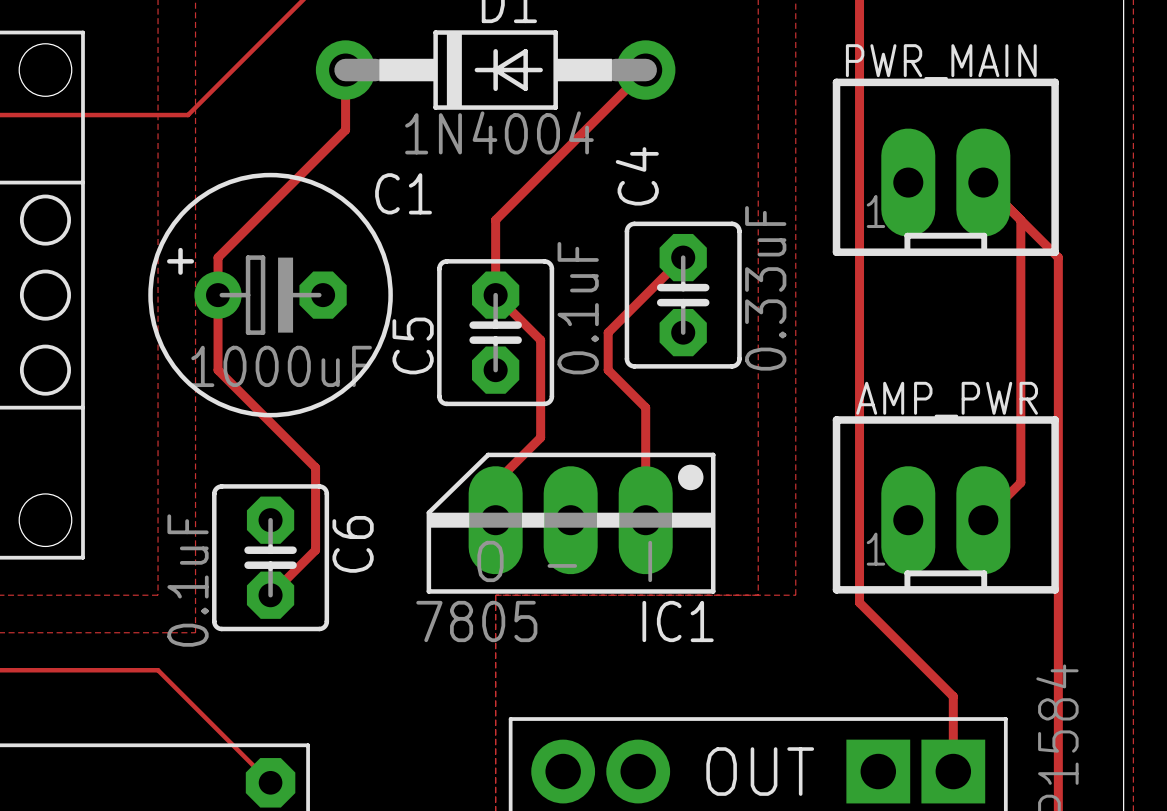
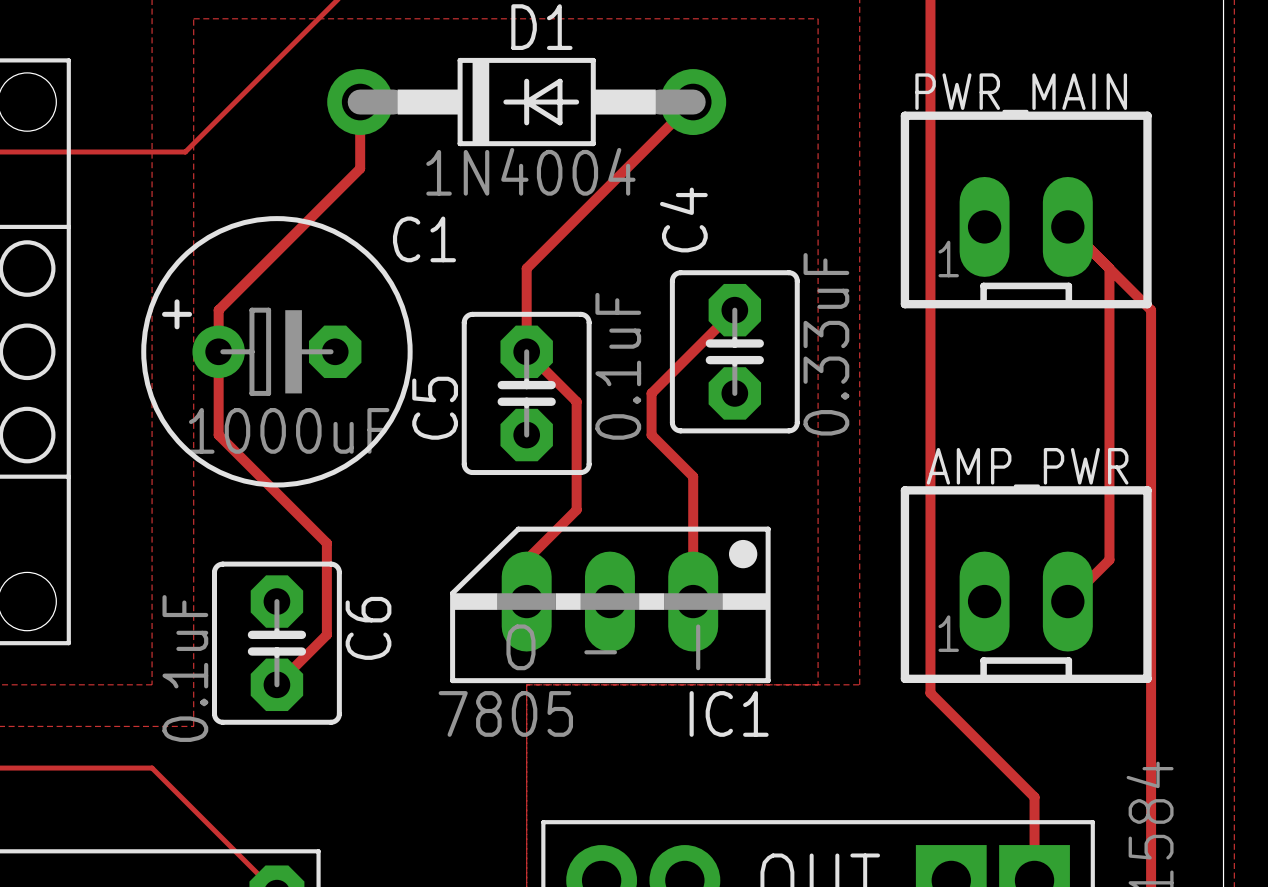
PWR_MAIN footprint: [832, 78, 1059, 256] -> [900, 111, 1152, 309]
AMP_PWR footprint: [832, 416, 1059, 594] -> [900, 486, 1152, 683]
IC1 footprint: [426, 452, 716, 594] -> [450, 526, 771, 684]

